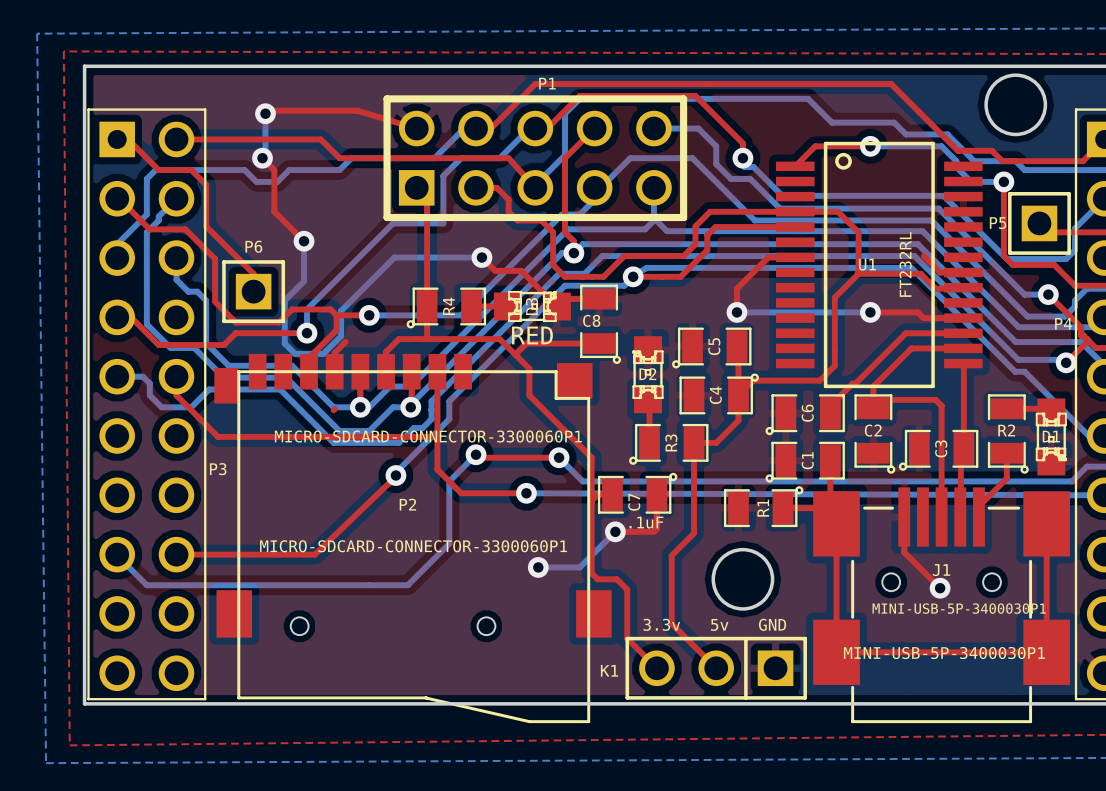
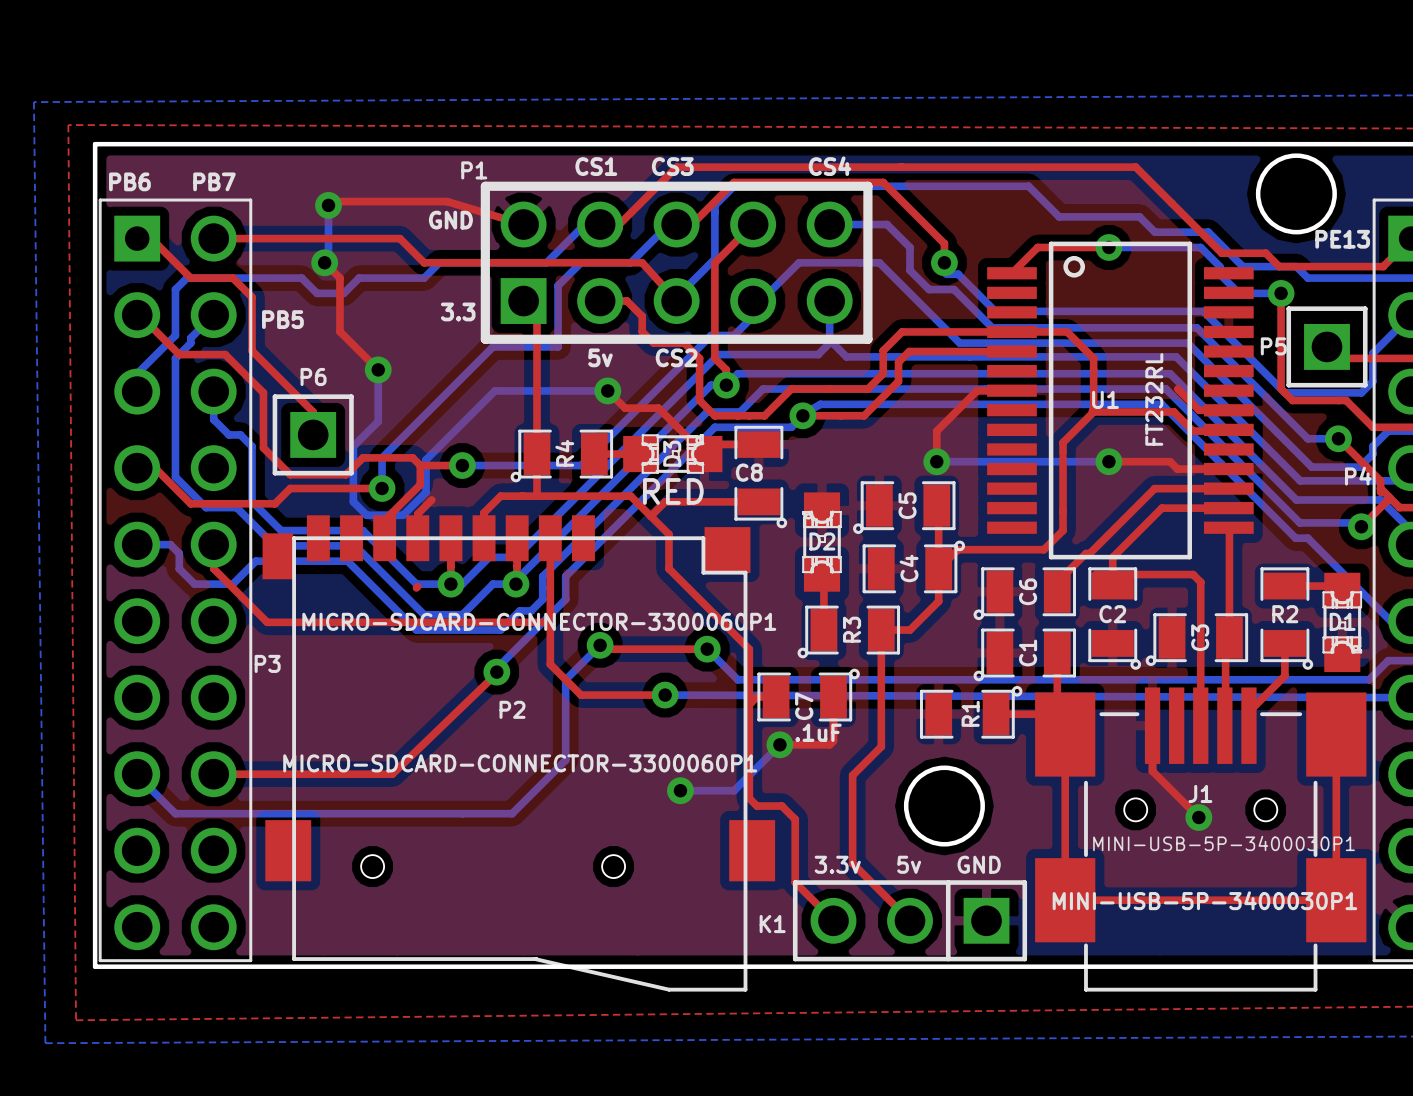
text: none -> CS1 (596, 166)
text: none -> CS3 (672, 166)
P1 name position: P1 (547, 83) -> P1 (474, 170)
text: none -> CS4 (830, 166)
text: none -> PB6 (129, 181)
text: none -> PB7 (214, 181)
text: none -> GND (450, 220)
text: none -> PE13 (1342, 239)
text: none -> 3.3 (458, 311)
text: none -> PB5 (282, 319)
text: none -> CS2 (676, 357)
text: none -> 5v (600, 357)

